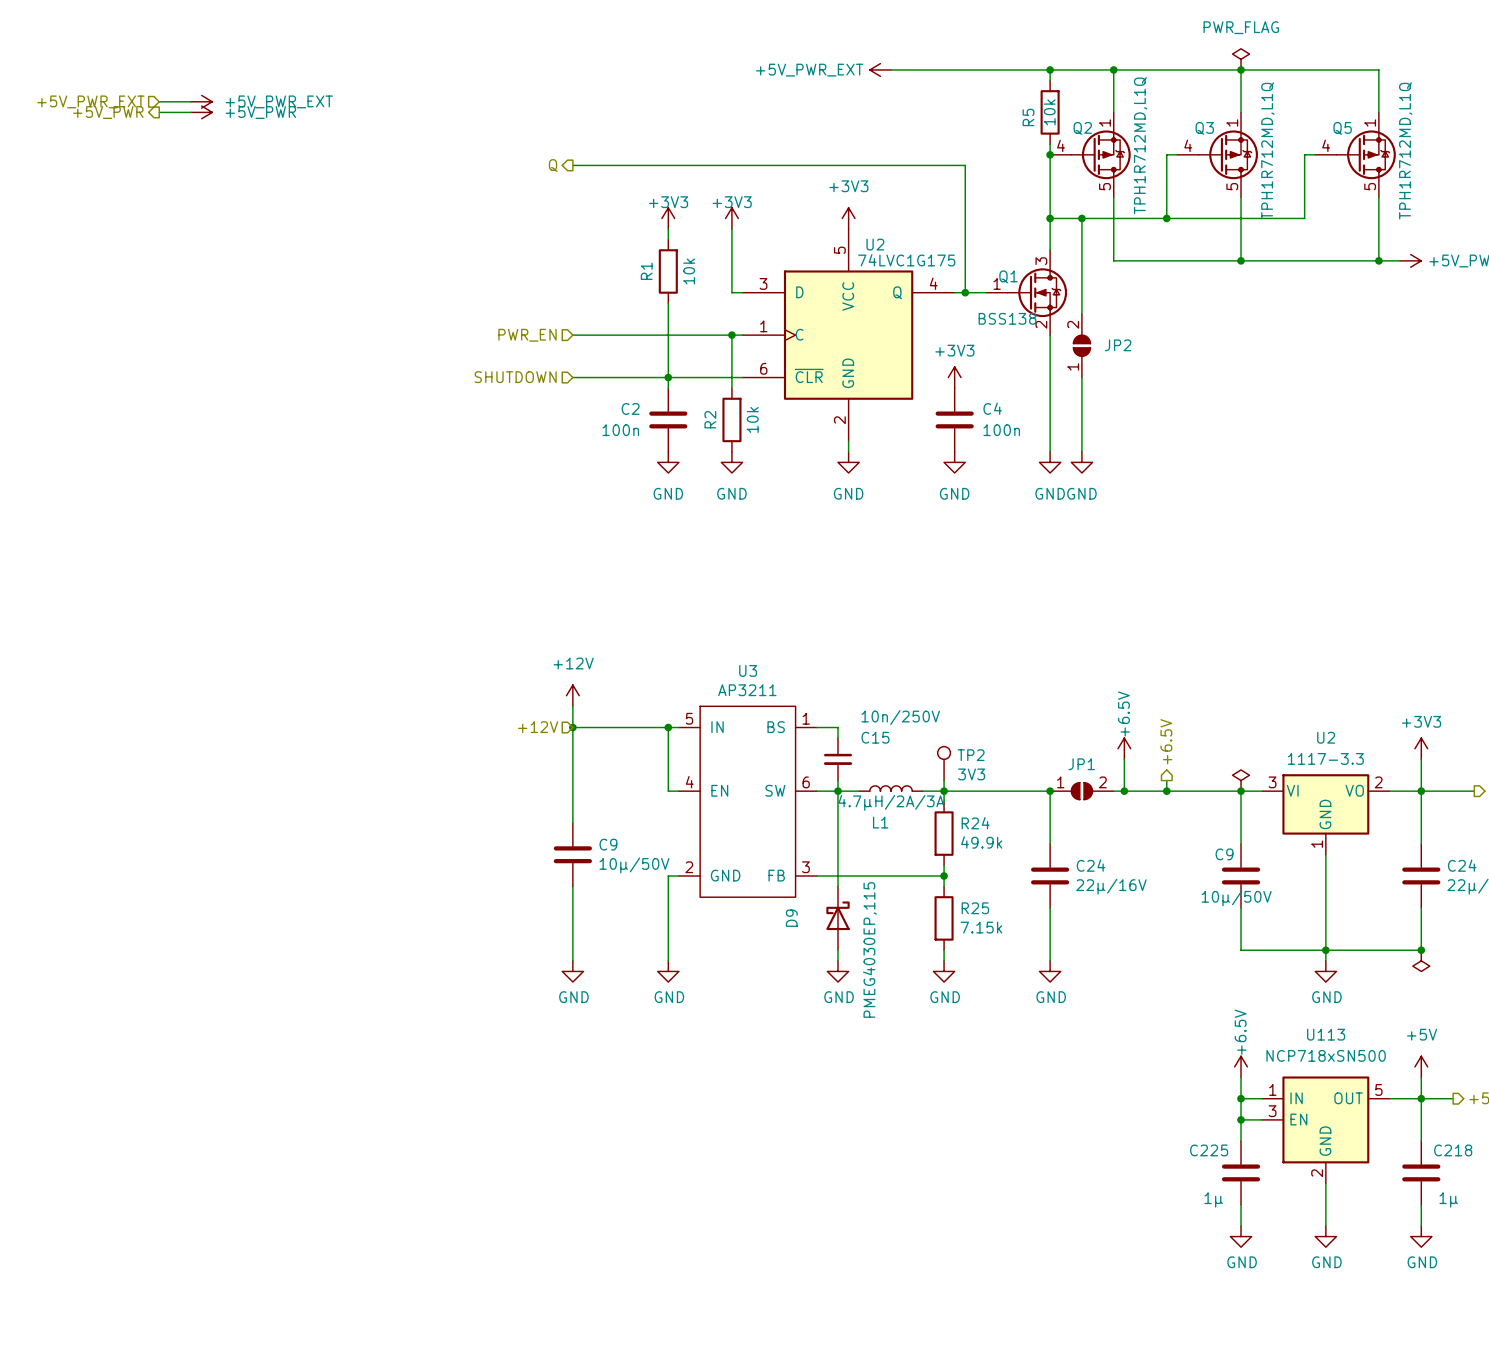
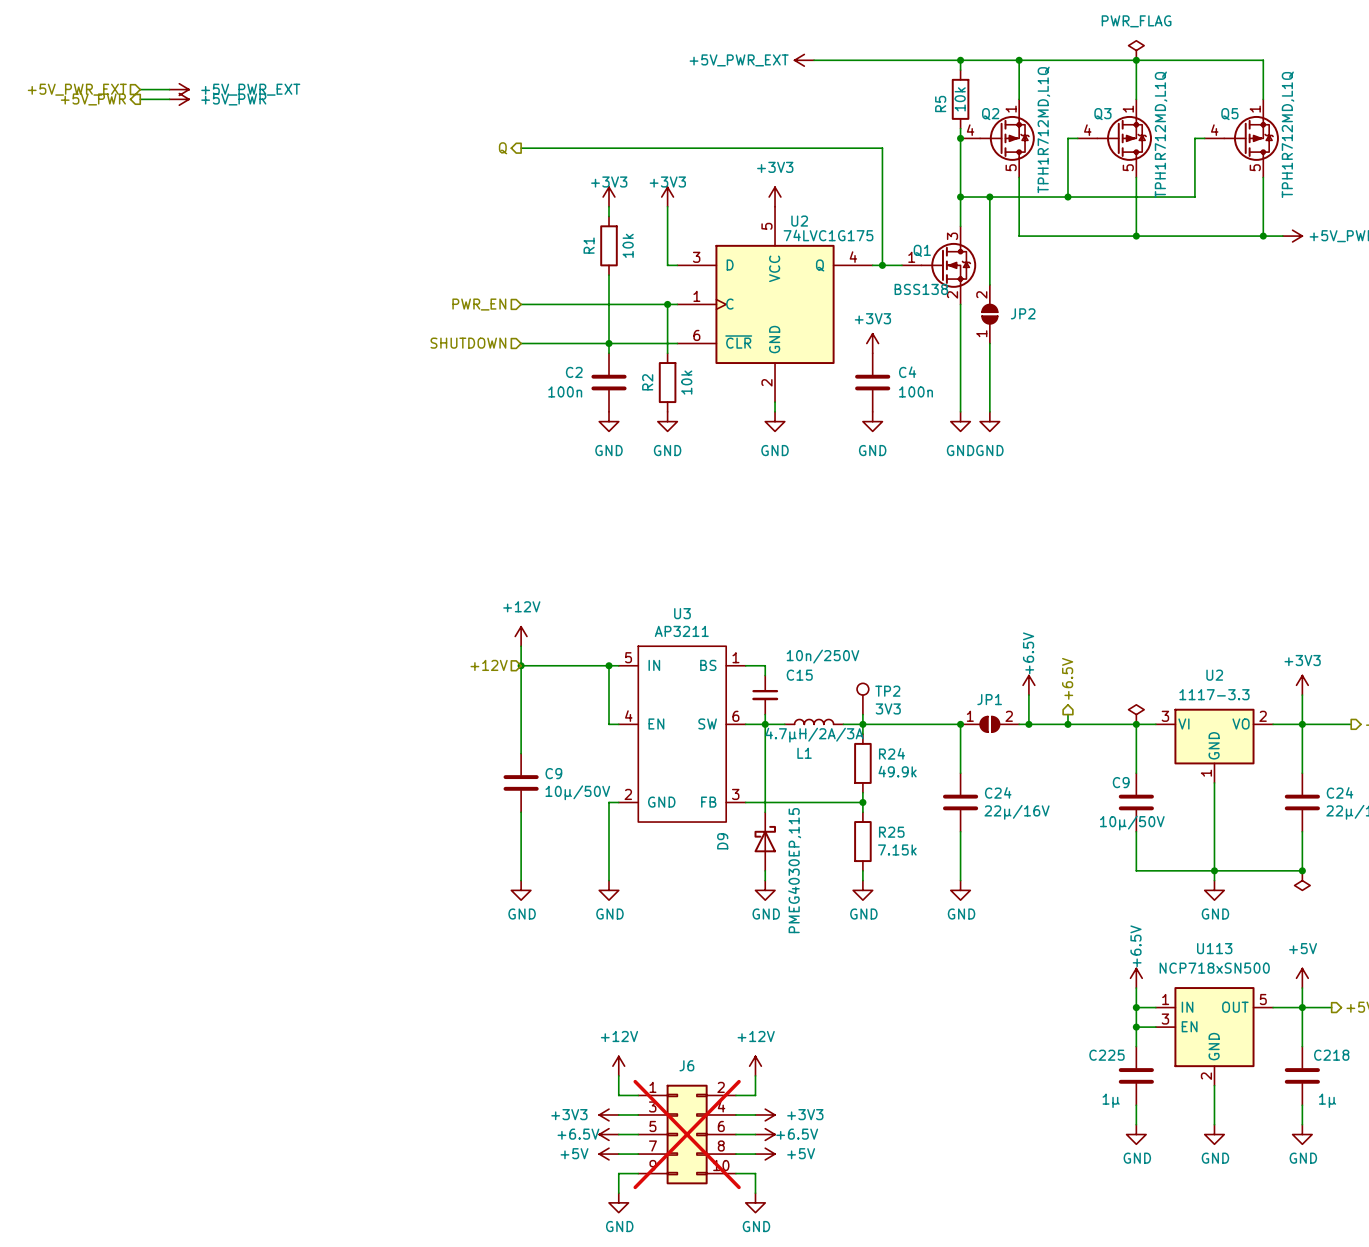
power symbol: none -> +12V (618, 1066)
power symbol: none -> +12V (755, 1066)
wire: none -> (618, 1075) (618, 1095) (638, 1095)
wire: none -> (755, 1075) (755, 1095) (735, 1095)
power symbol: none -> +3V3 (609, 1114)
wire: none -> (618, 1114) (638, 1114)
wire: none -> (735, 1114) (755, 1114)
power symbol: none -> +3V3 (765, 1114)
power symbol: none -> +6.5V (609, 1134)
wire: none -> (618, 1134) (638, 1134)
J6: none -> (687, 1134)
wire: none -> (735, 1134) (755, 1134)
power symbol: none -> +6.5V (765, 1134)
power symbol: none -> +5V (609, 1154)
wire: none -> (618, 1154) (638, 1154)
wire: none -> (735, 1154) (755, 1154)
power symbol: none -> +5V (765, 1154)
wire: none -> (638, 1173) (618, 1173) (618, 1193)
wire: none -> (735, 1173) (755, 1173) (755, 1193)
power symbol: none -> GND (618, 1202)
power symbol: none -> GND (755, 1202)

